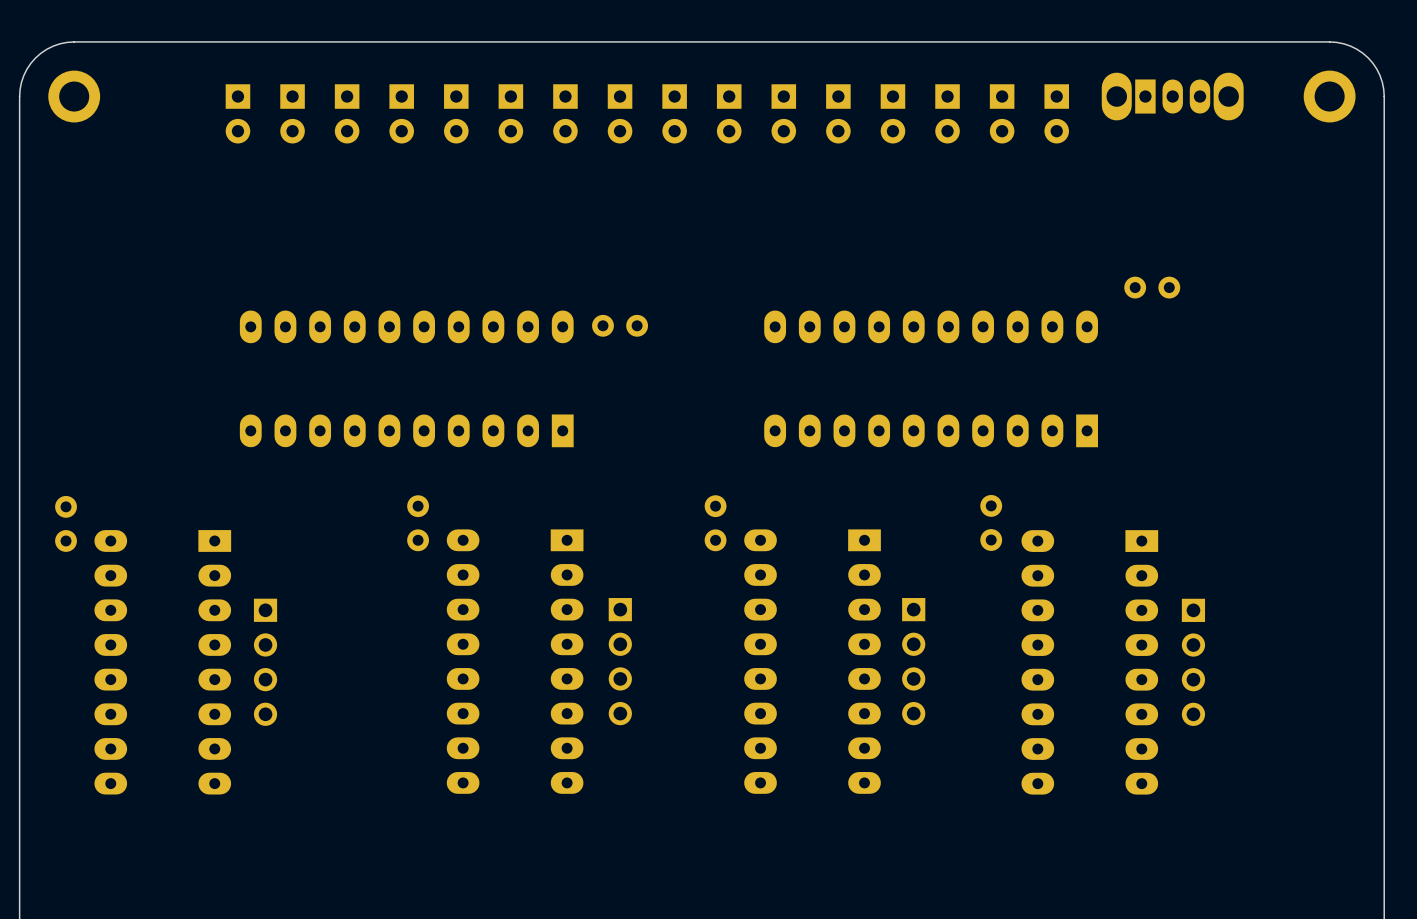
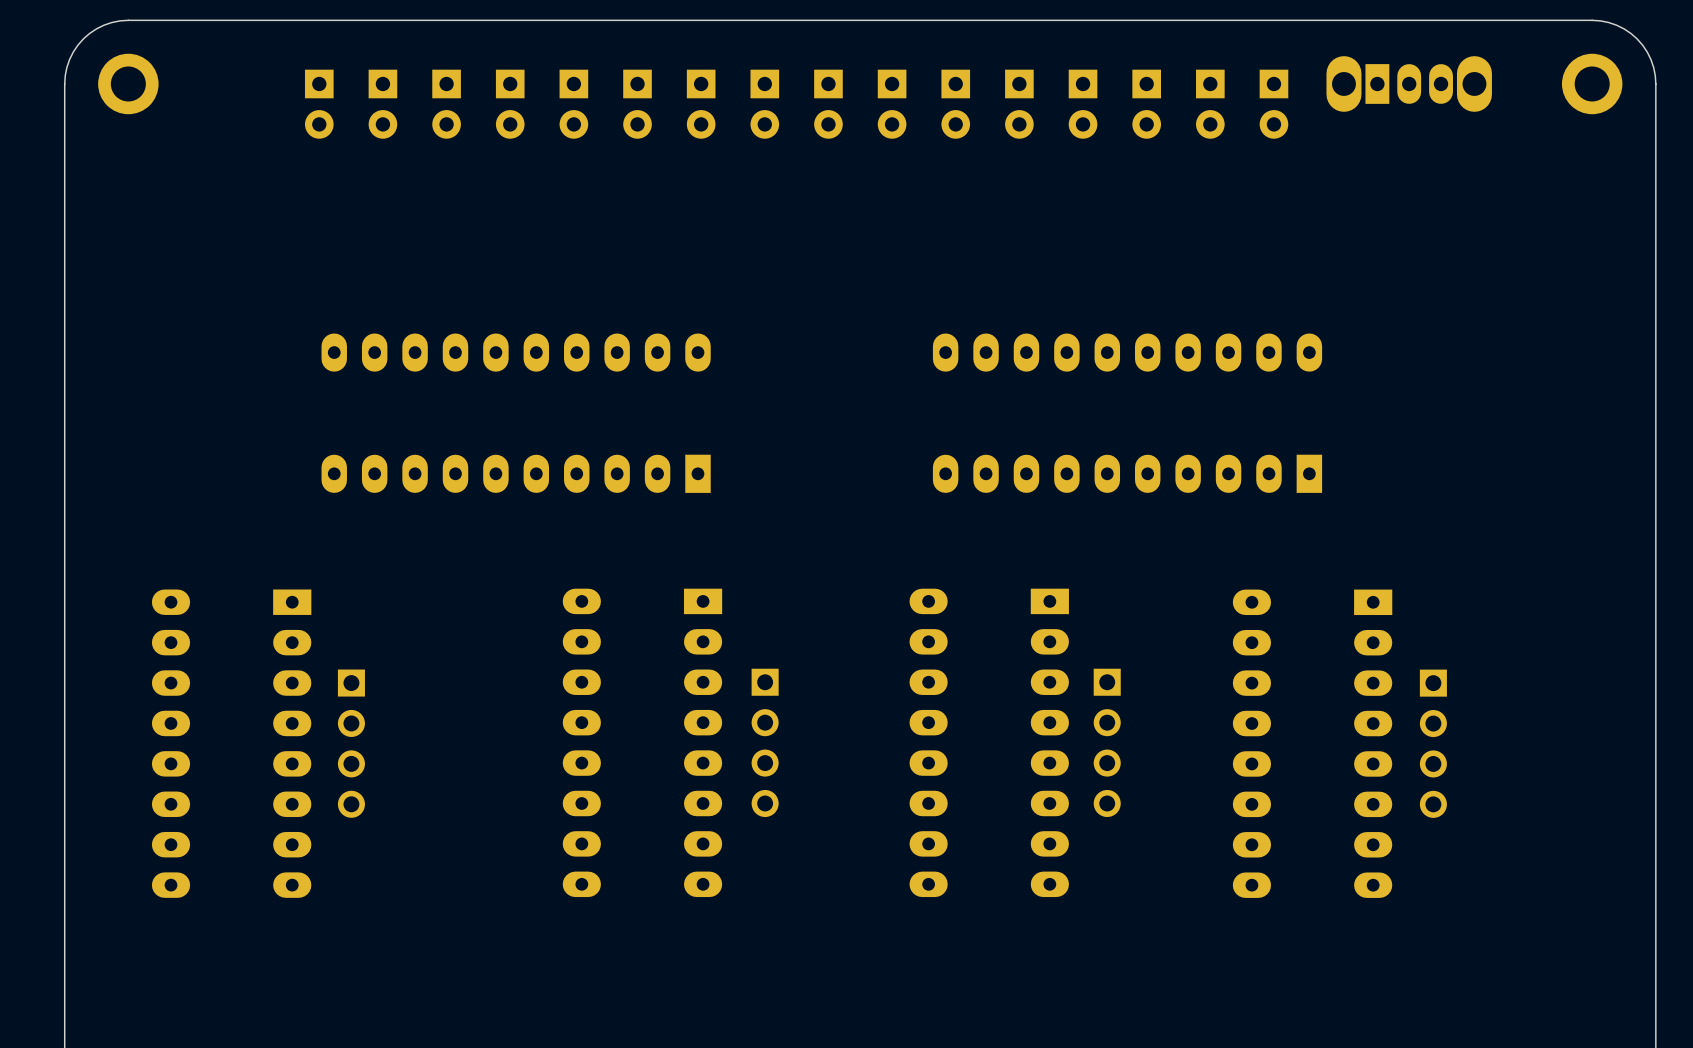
part: (1152, 287) -> none
part: (620, 325) -> none
part: (991, 522) -> none
part: (66, 523) -> none
part: (418, 523) -> none
part: (715, 523) -> none

